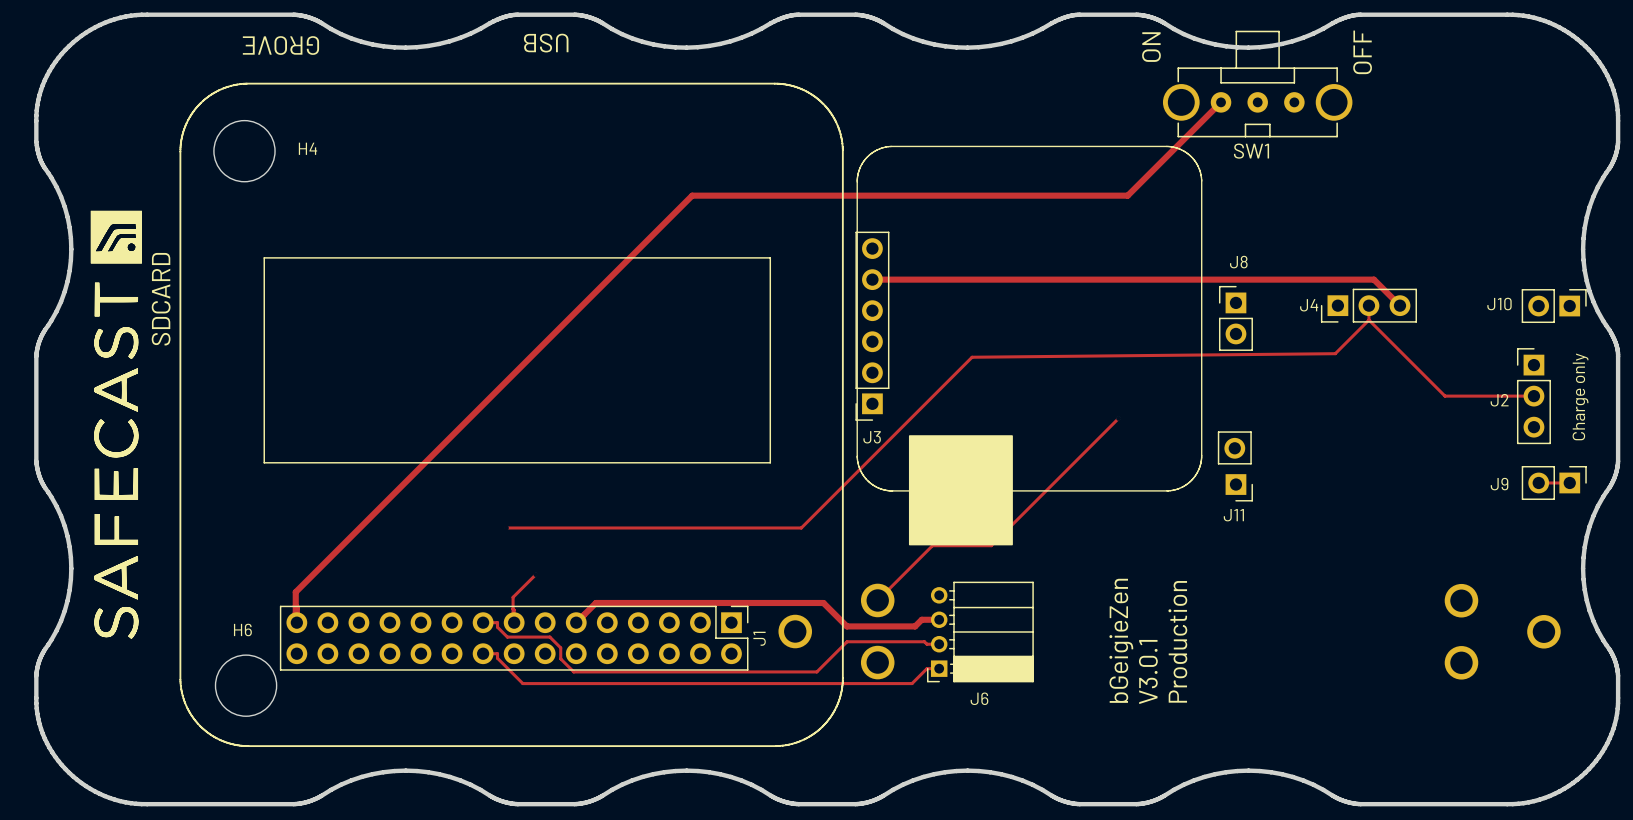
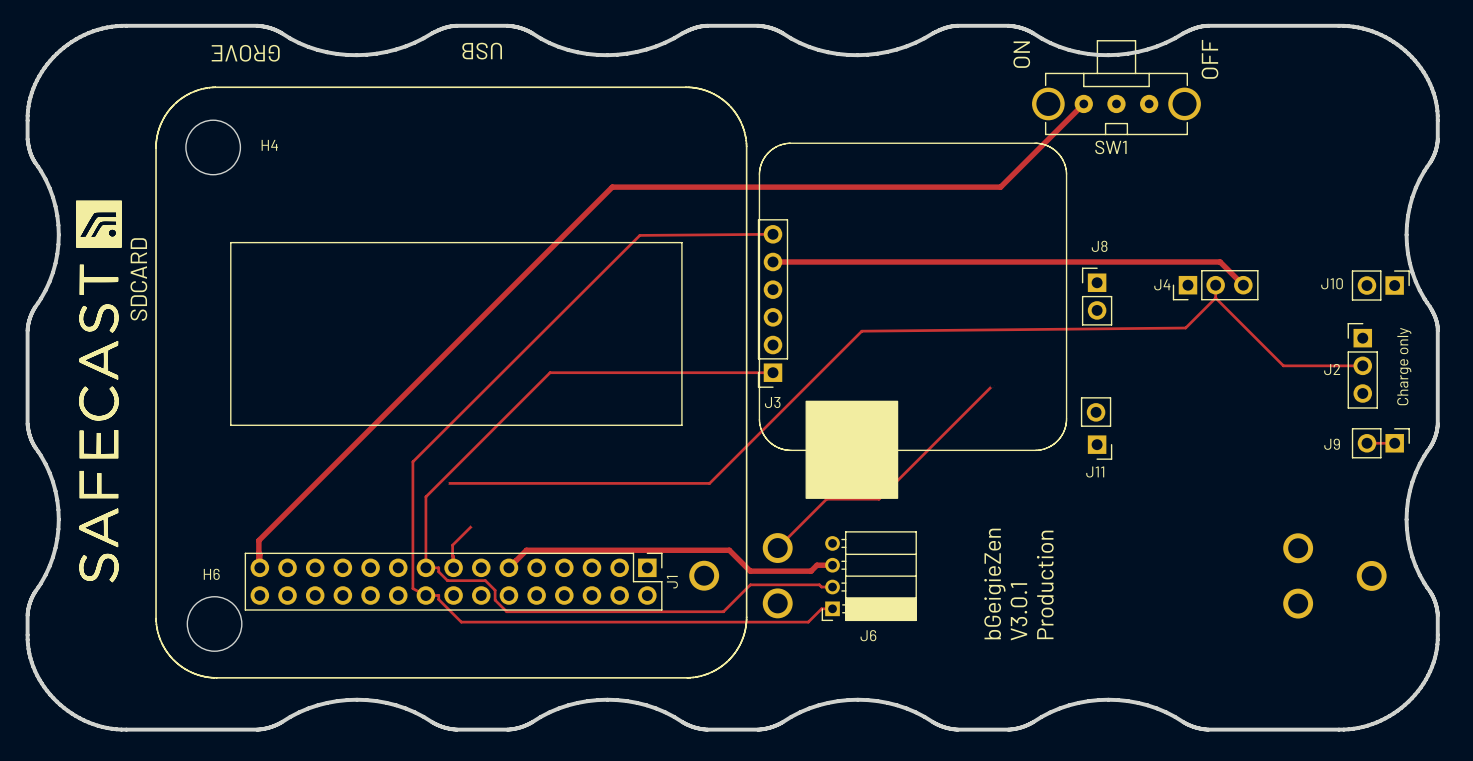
track: none -> (773, 234) (639, 235) (412, 461) (412, 588) (425, 595)
track: none -> (773, 372) (550, 372) (425, 496) (425, 567)

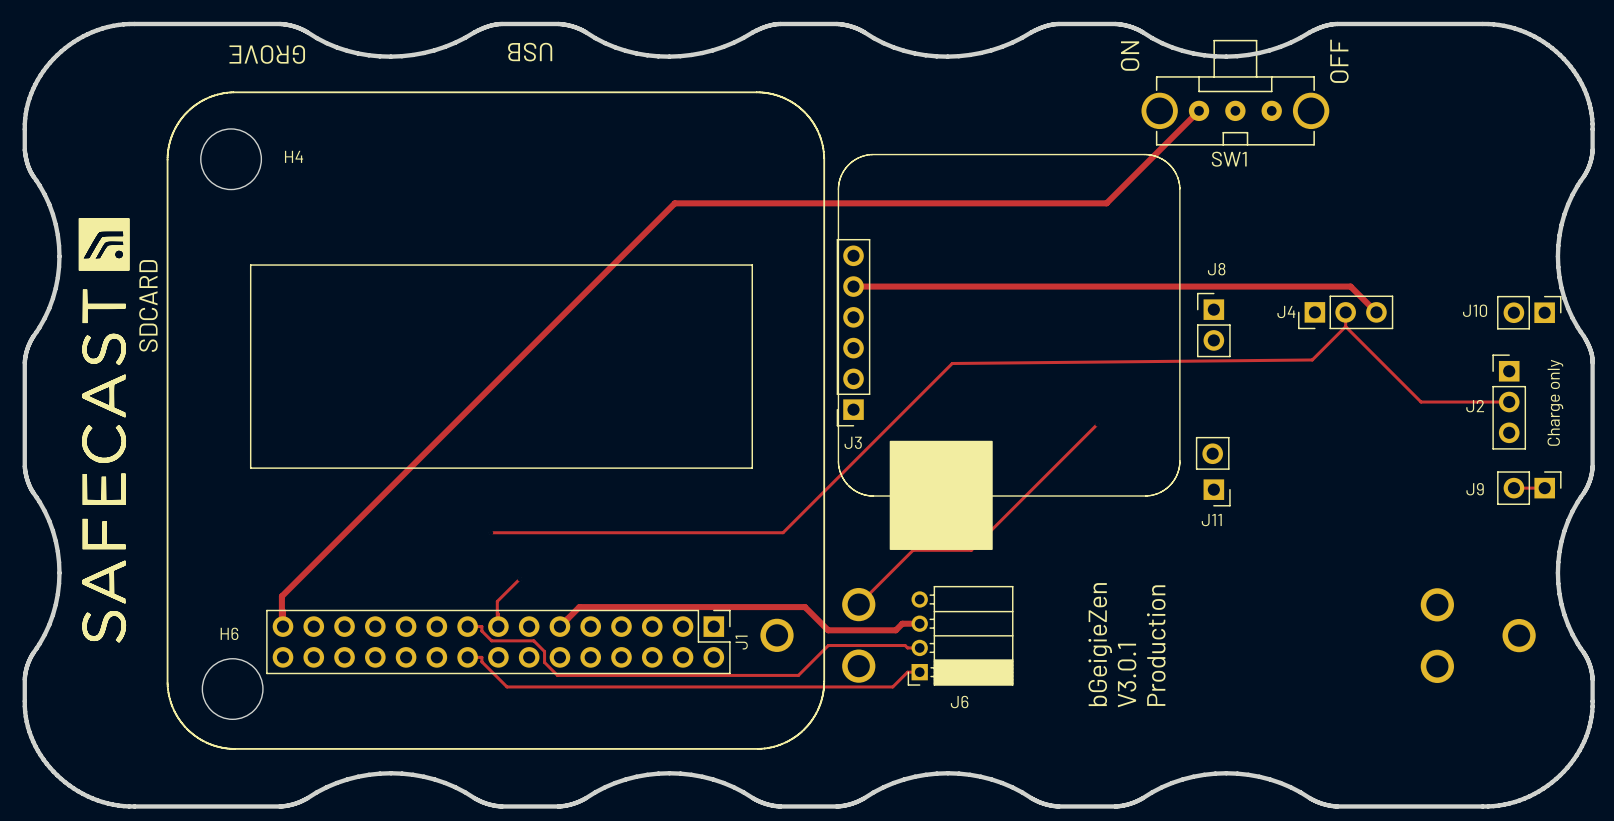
track: (773, 234) (639, 235) (412, 461) (412, 588) (425, 595) -> none
track: (773, 372) (550, 372) (425, 496) (425, 567) -> none

